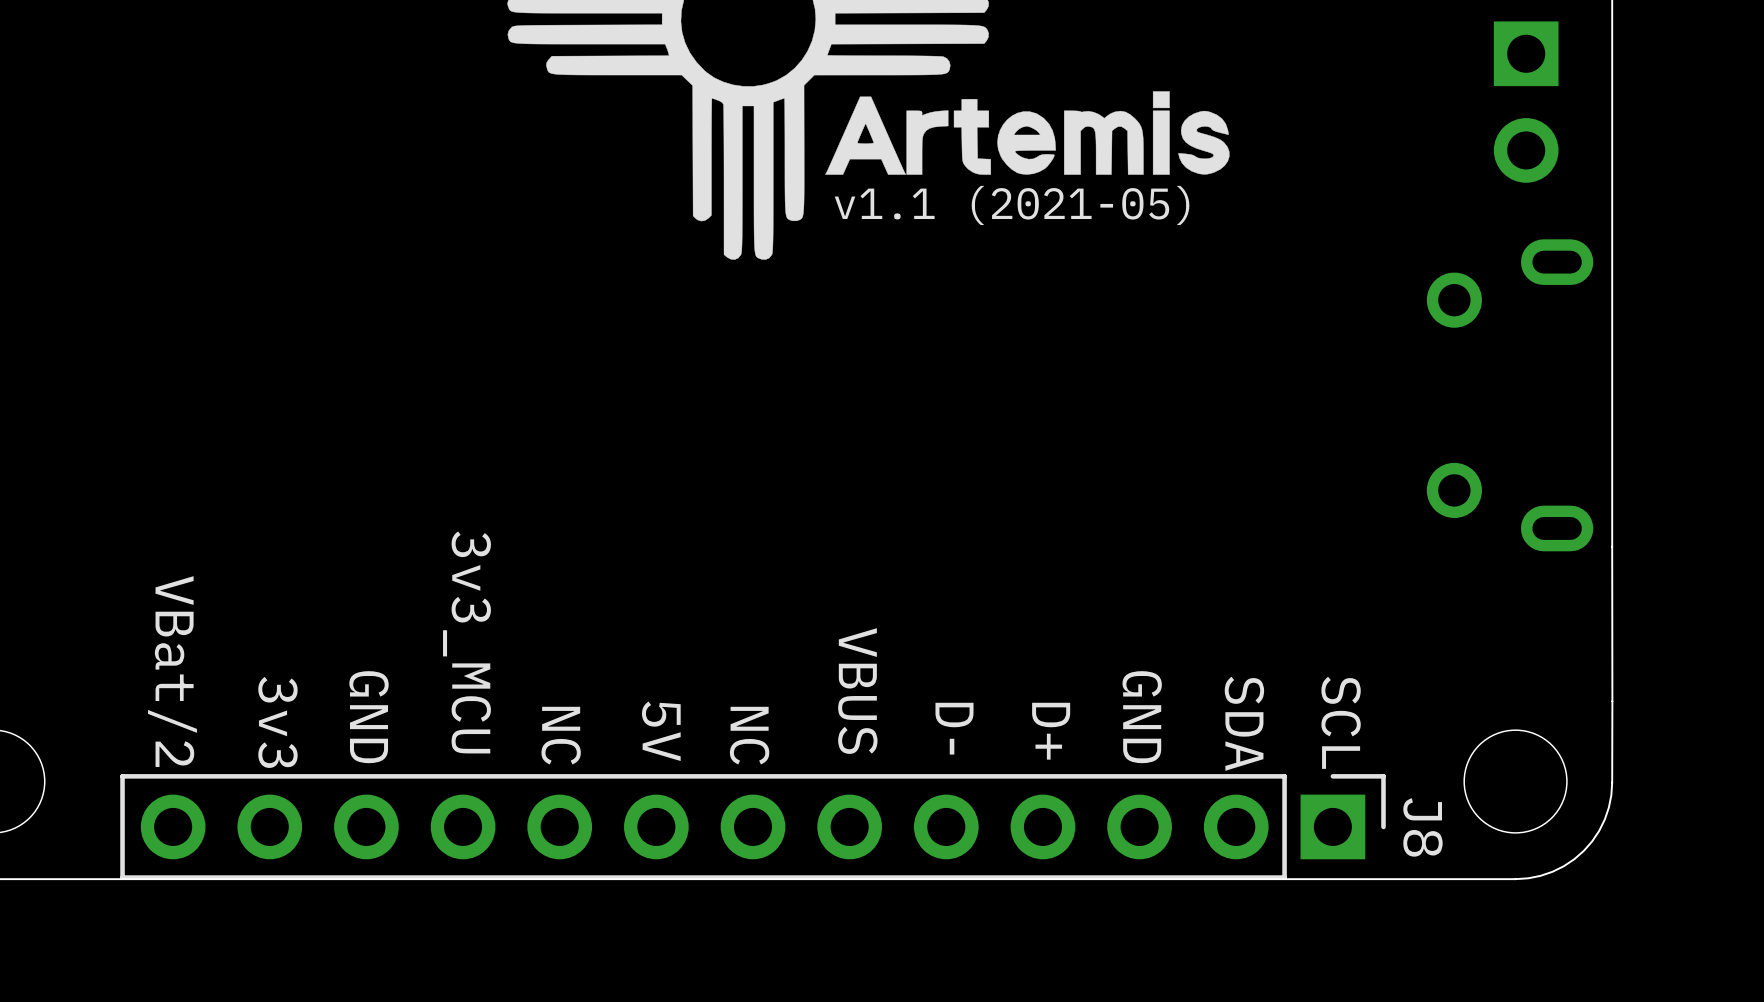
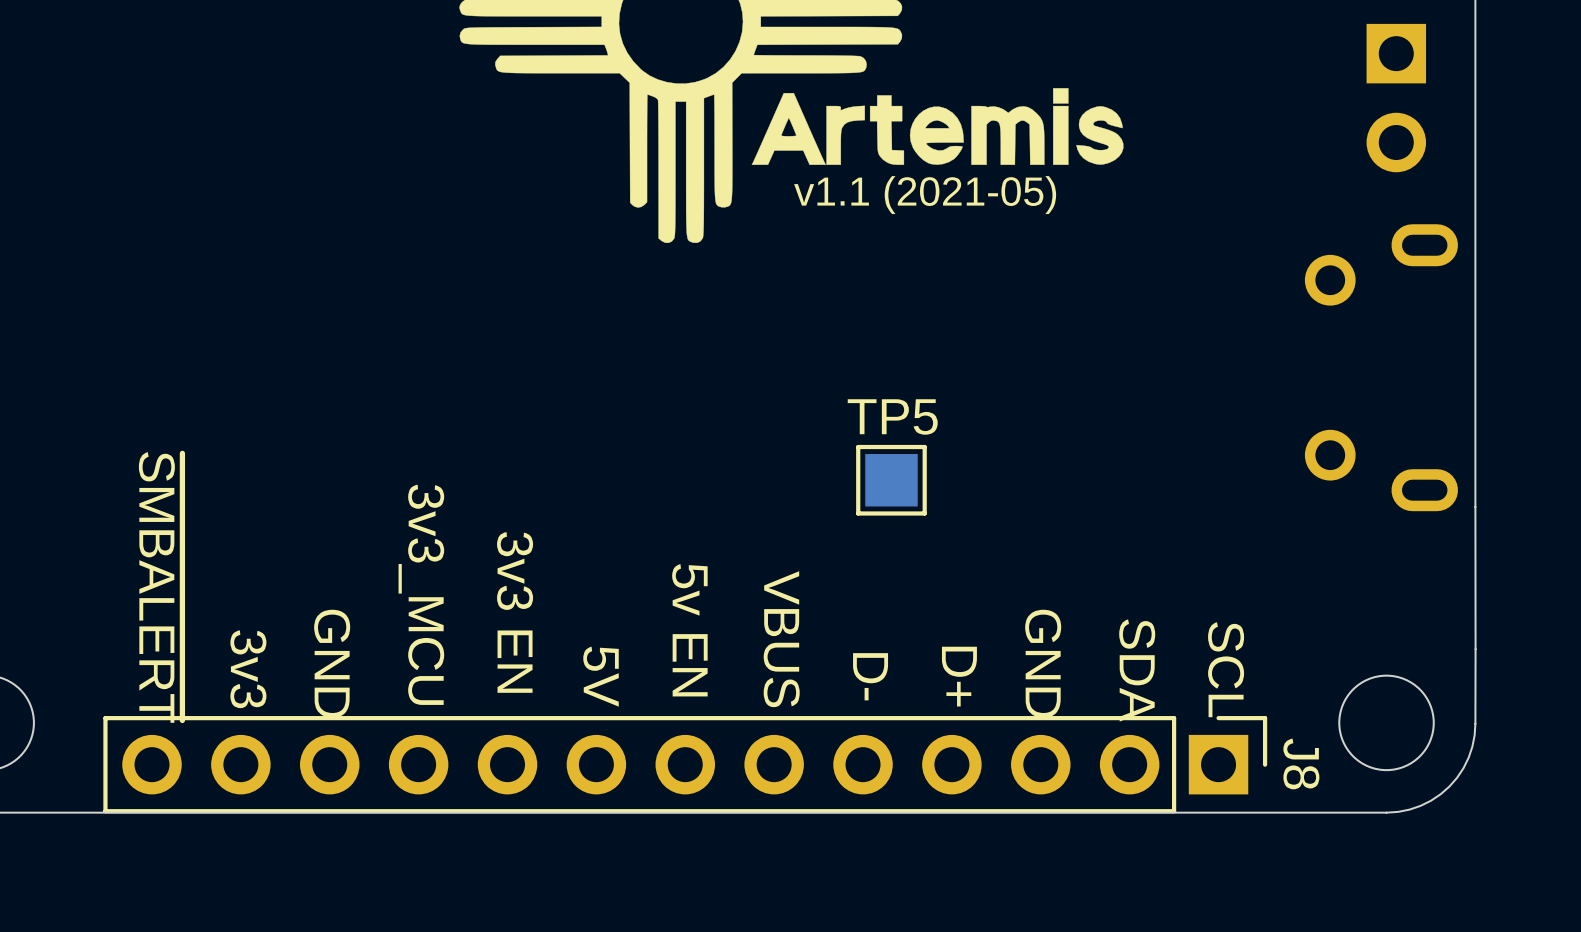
TP5: none -> (891, 480)
text: none -> ~{SMBALERT} (160, 587)
text: none -> 3v3 EN (515, 612)
text: VBat/2 (172, 671) -> none
text: none -> 5v EN (689, 630)
text: NC (561, 735) -> none
text: NC (749, 735) -> none

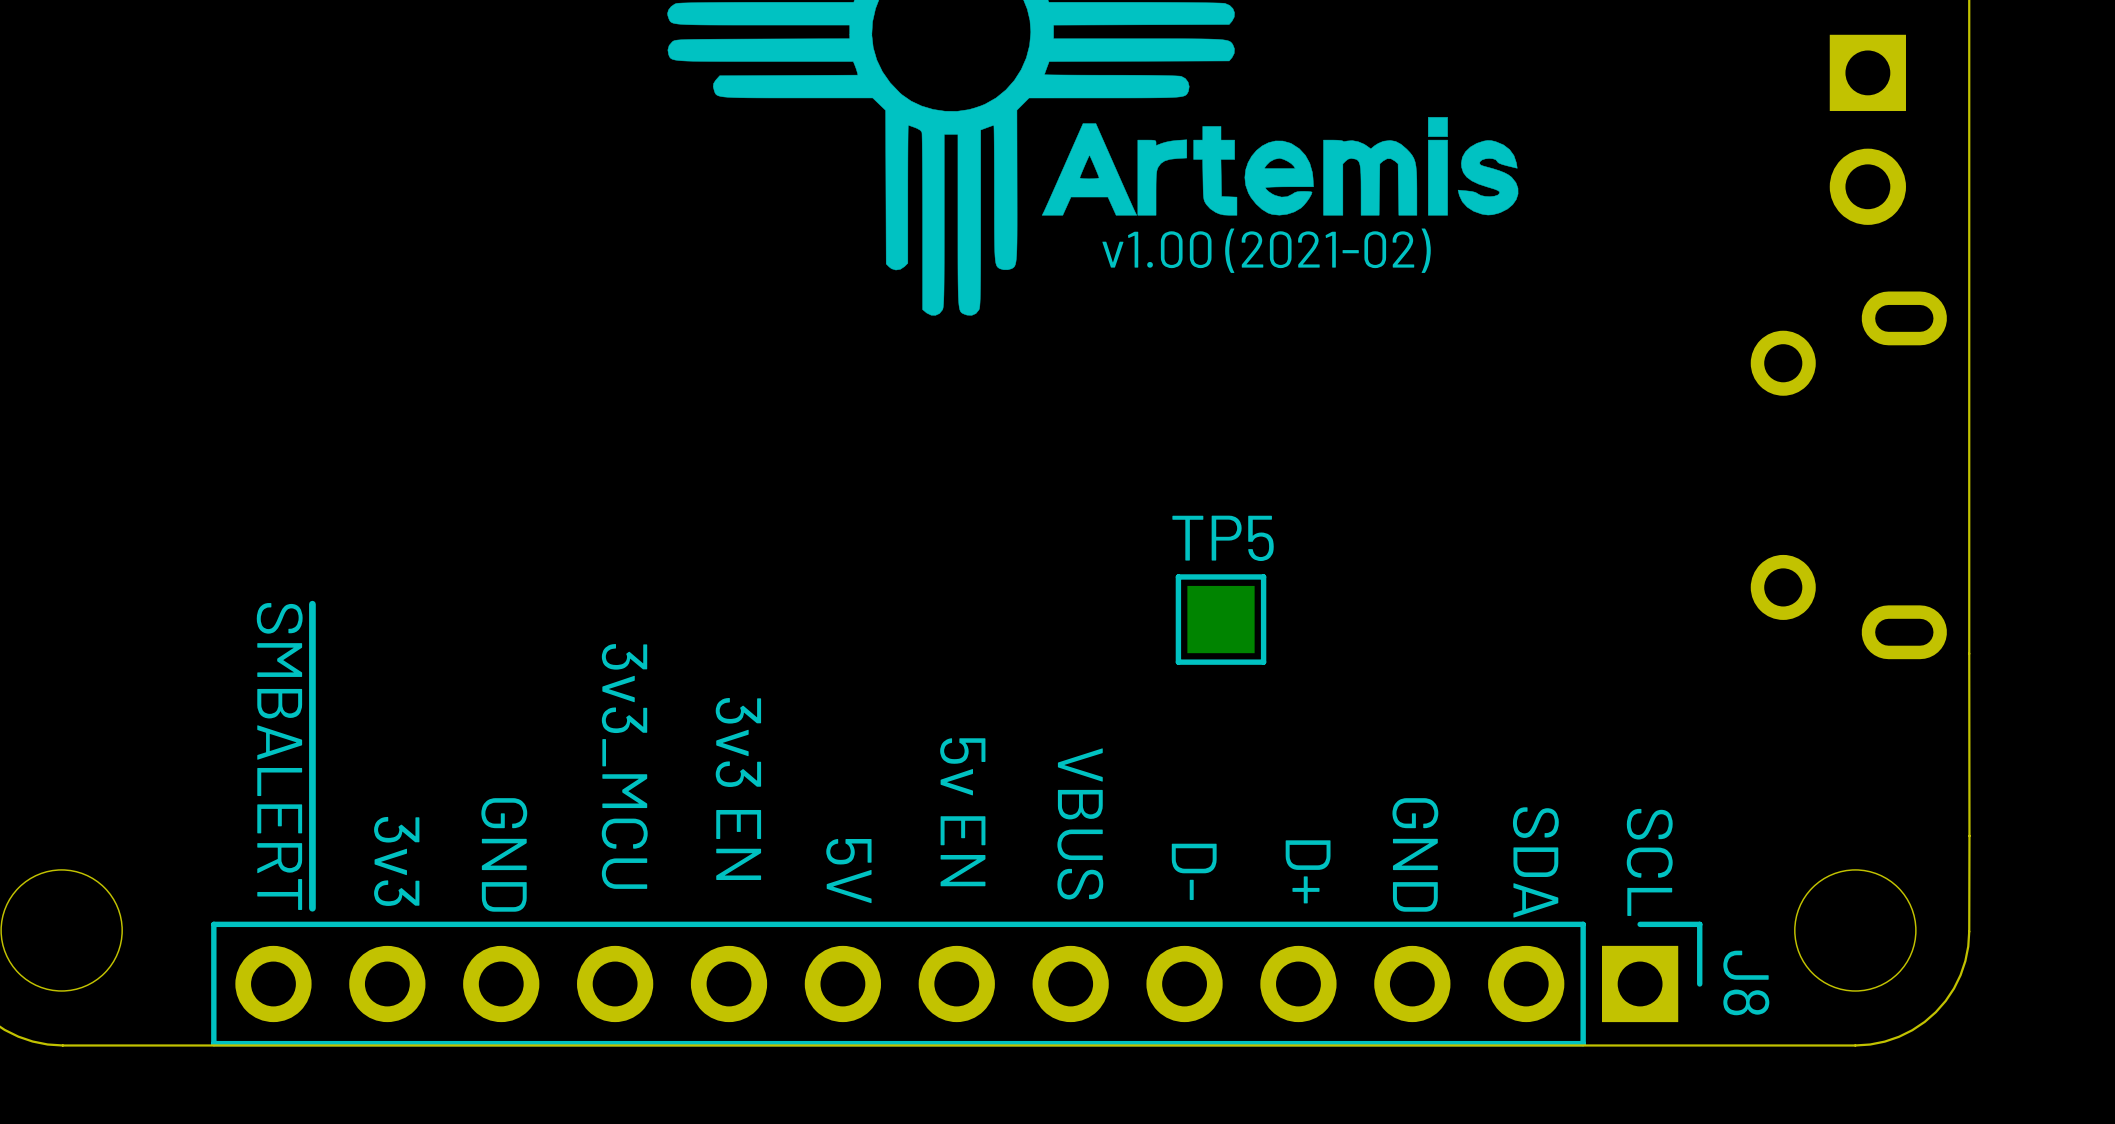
text: v1.1 (2021-05) (925, 195) -> v1.00 (2021-02) (1266, 250)

